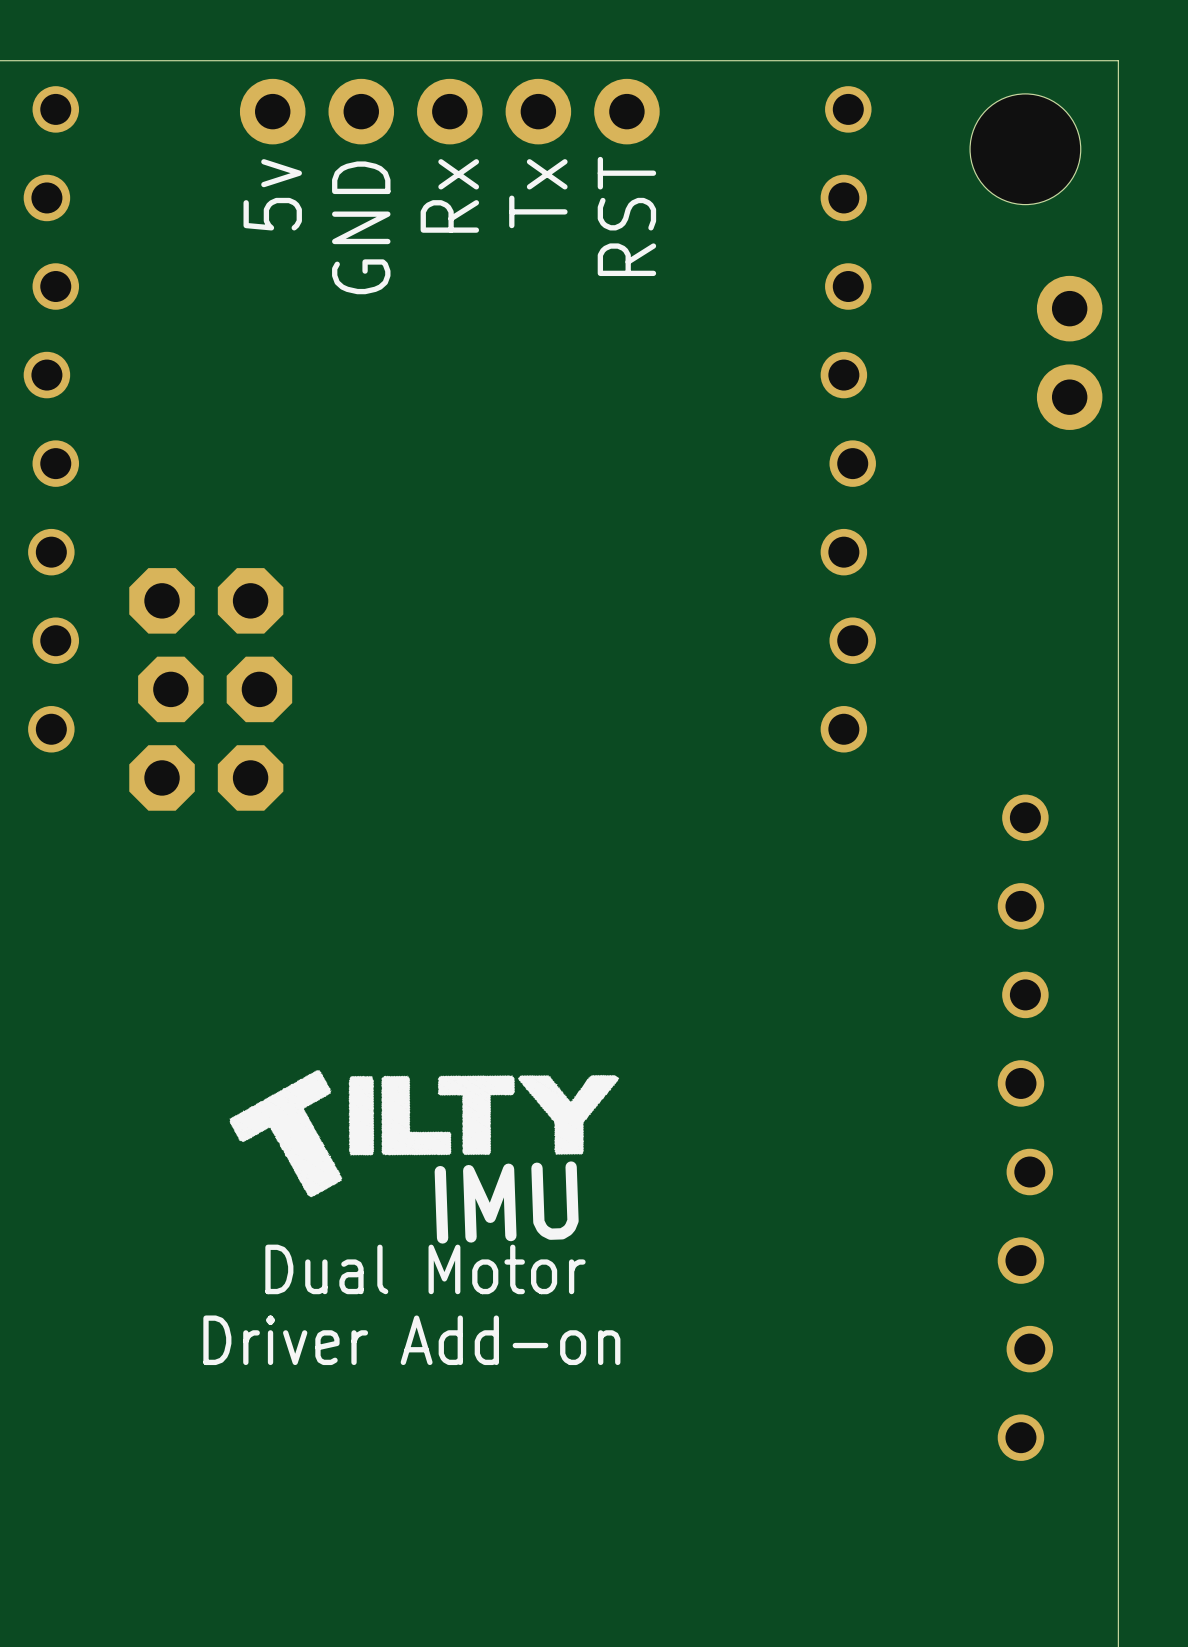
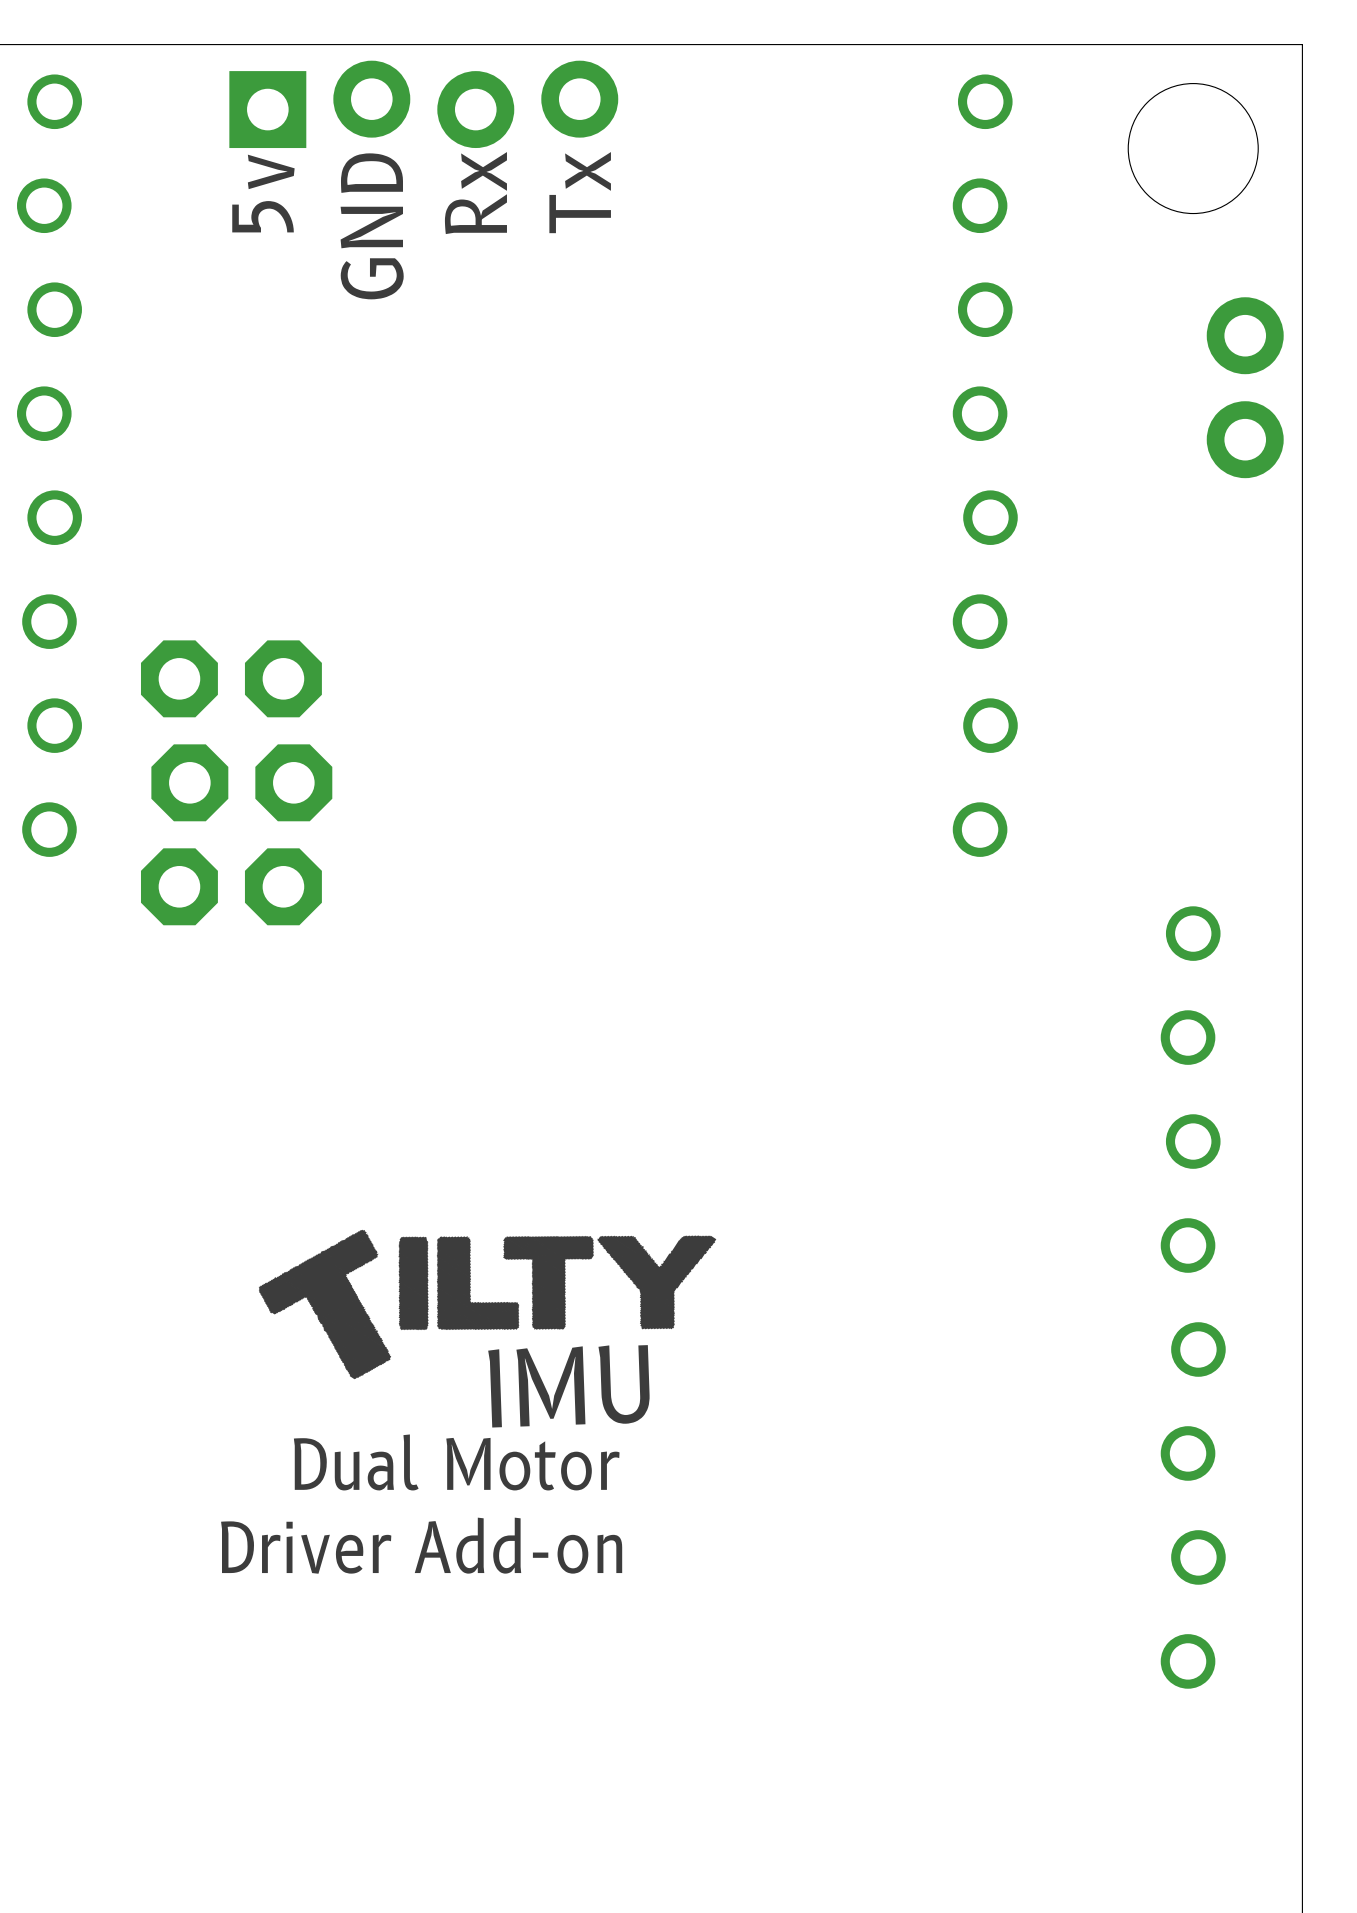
part: none -> (423, 104)
part: (449, 111) -> none
text position: Tx (538, 193) -> Tx (580, 192)
text position: 5v (272, 194) -> 5v (263, 193)
text position: Rx (449, 195) -> Rx (475, 193)
text: RST (626, 216) -> none
text position: GND (361, 227) -> GND (372, 226)

